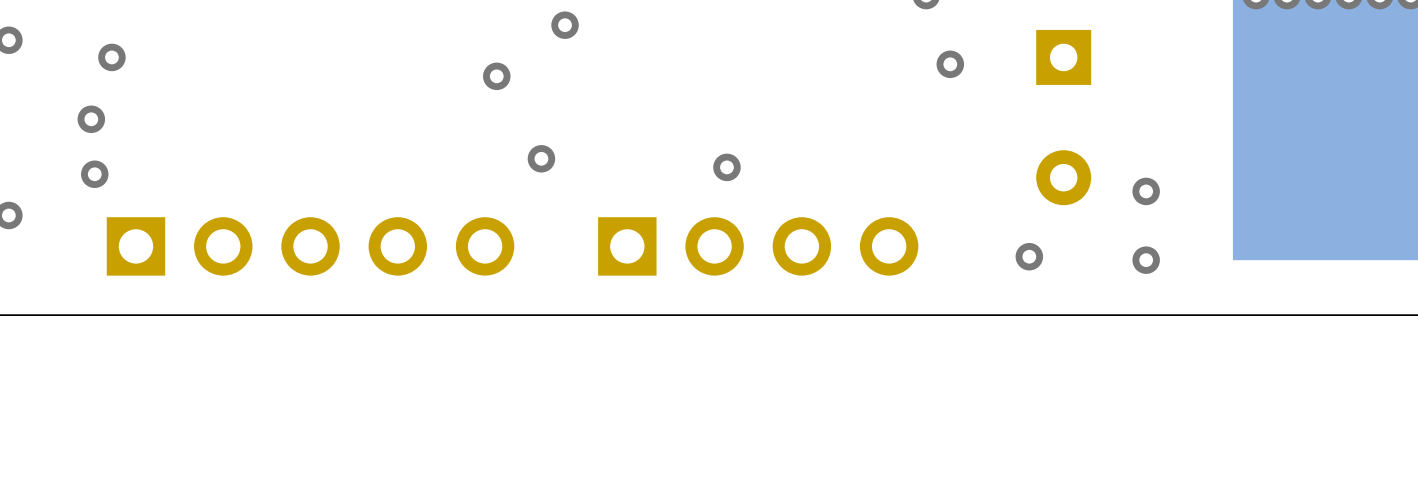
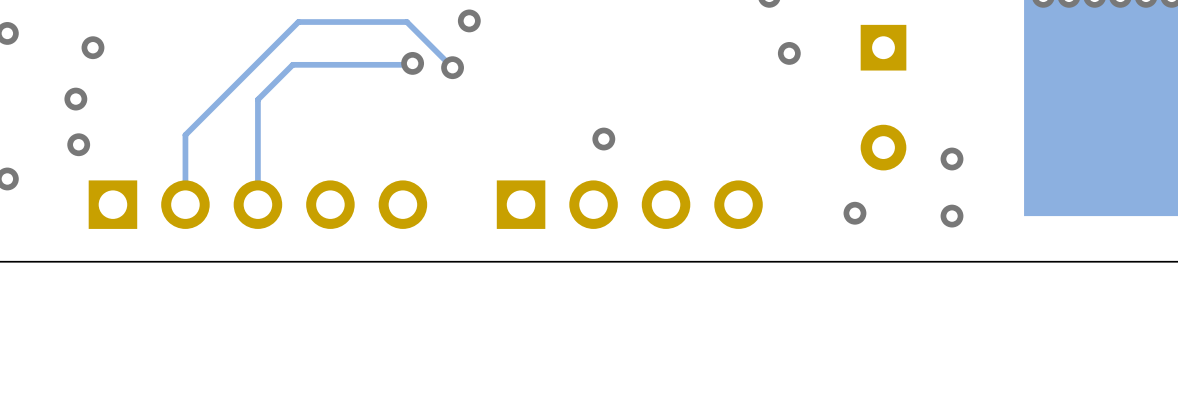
track: none -> (412, 64) (292, 64) (257, 99) (257, 204)
track: none -> (452, 67) (406, 22) (298, 22) (185, 135) (185, 204)
via position: (541, 158) -> (452, 67)

